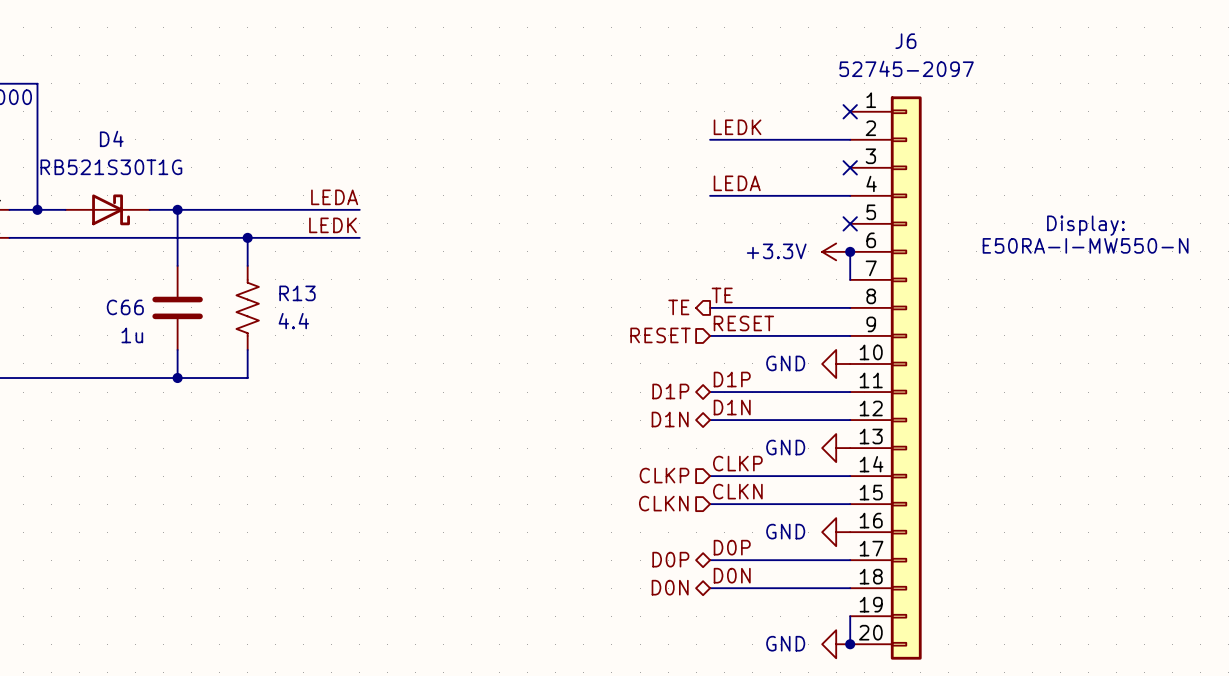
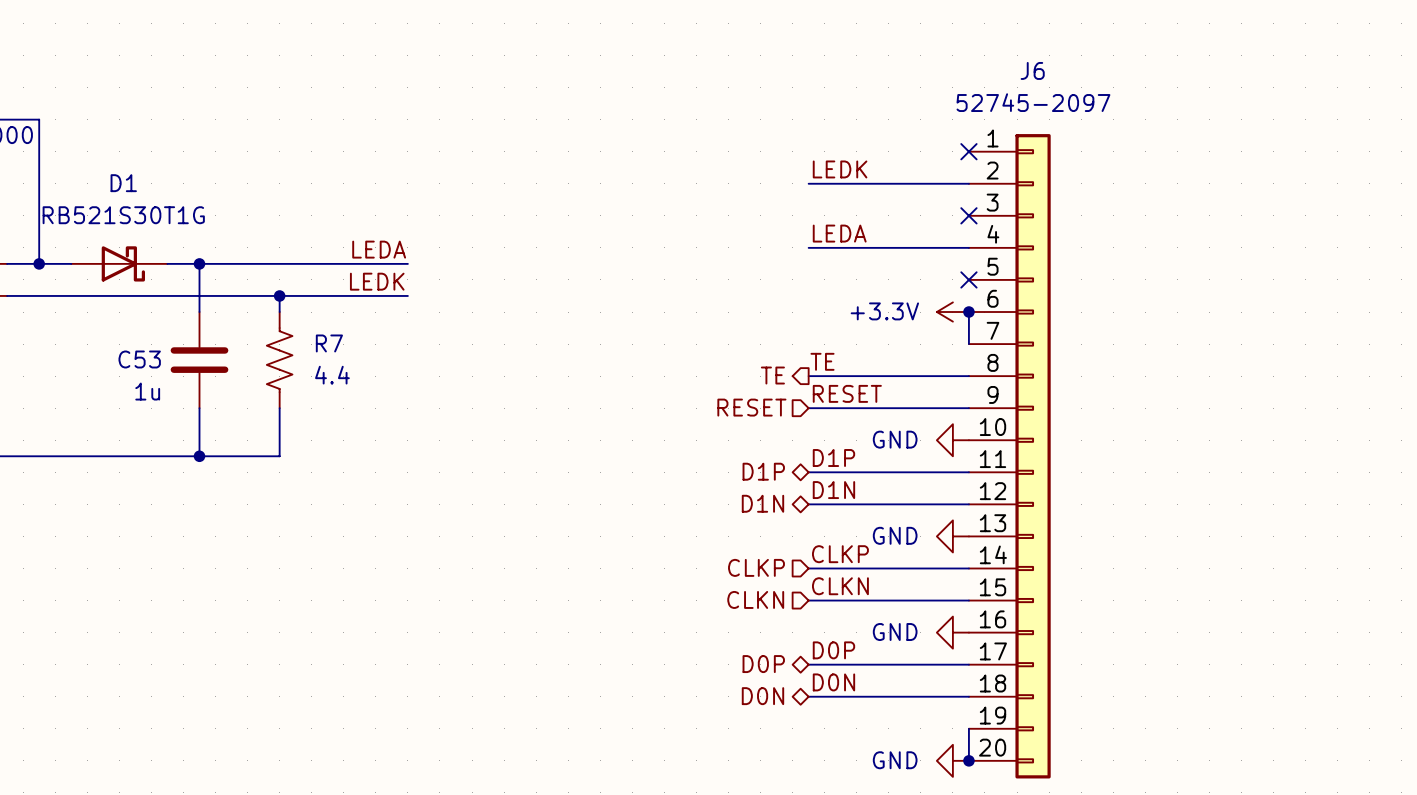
D4 name: D4 (111, 138) -> D1 (123, 183)
text: Display: (1085, 225) -> none
text: E50RA-I-MW550-N (1085, 245) -> none
C53: none -> 1u (199, 360)
R7: none -> 4.4 (279, 360)
C66: 1u (177, 307) -> none
R13: 4.4 (247, 307) -> none

